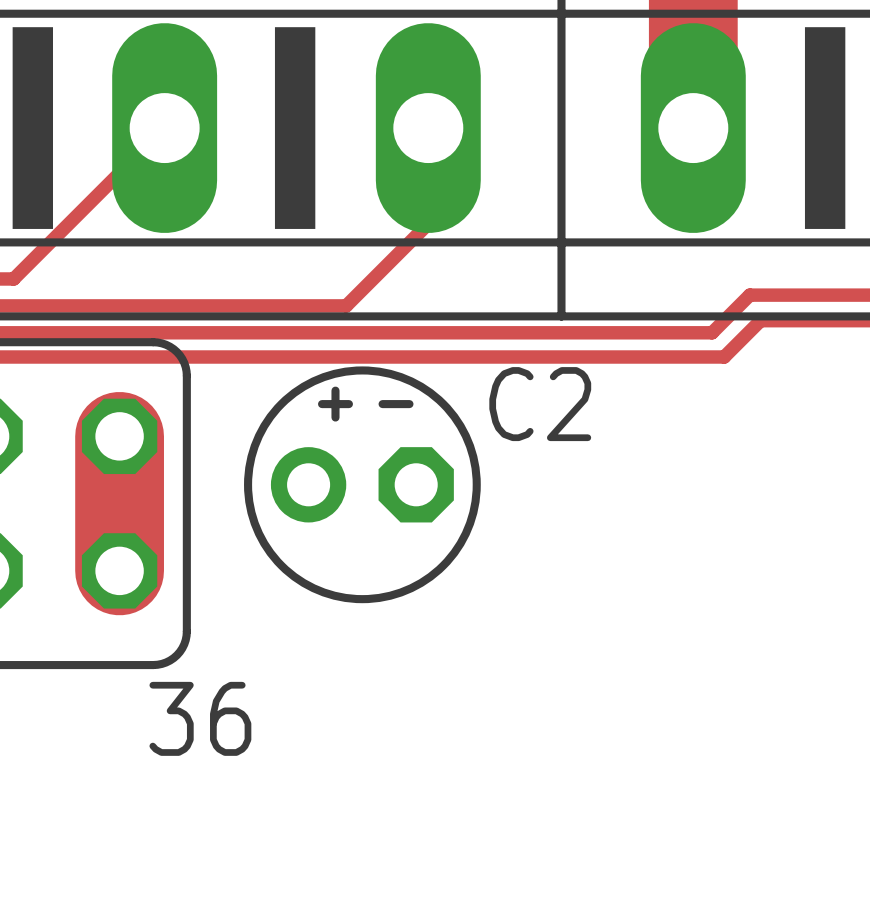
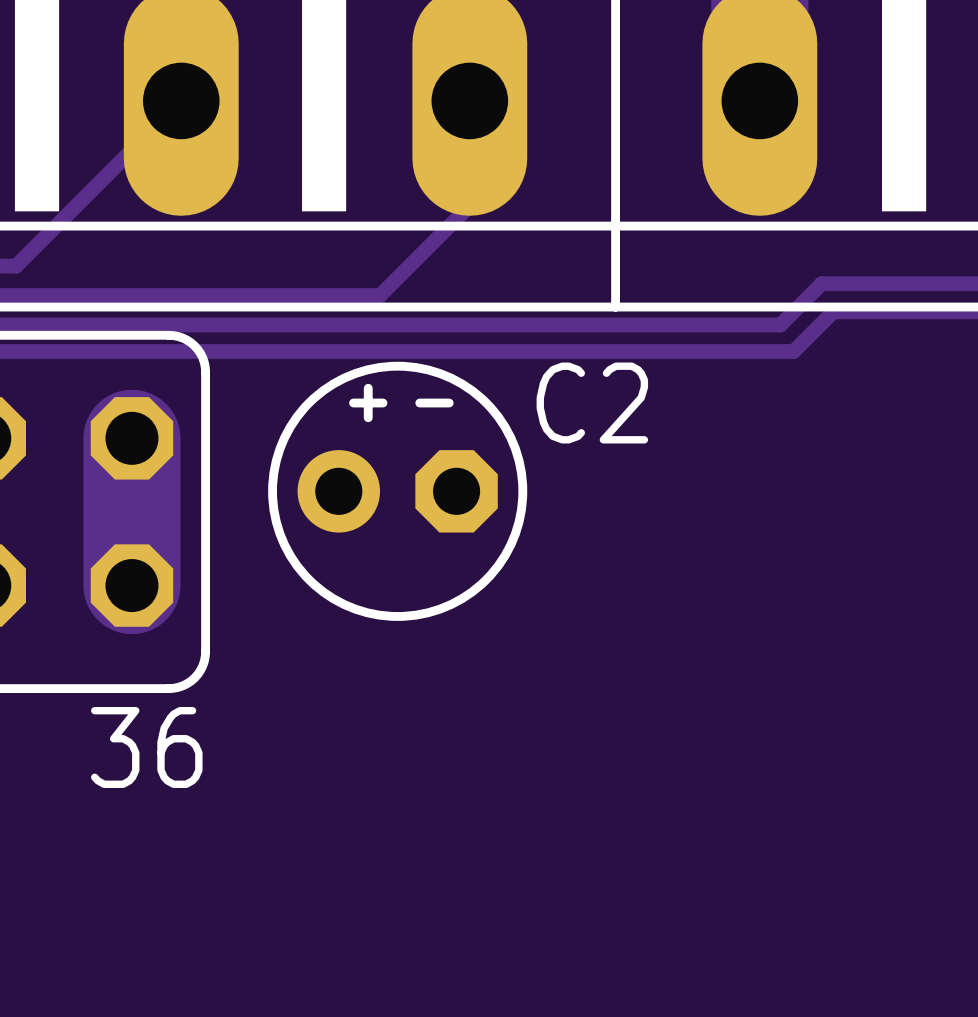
part text position: 36 (200, 718) -> 36 (146, 747)

